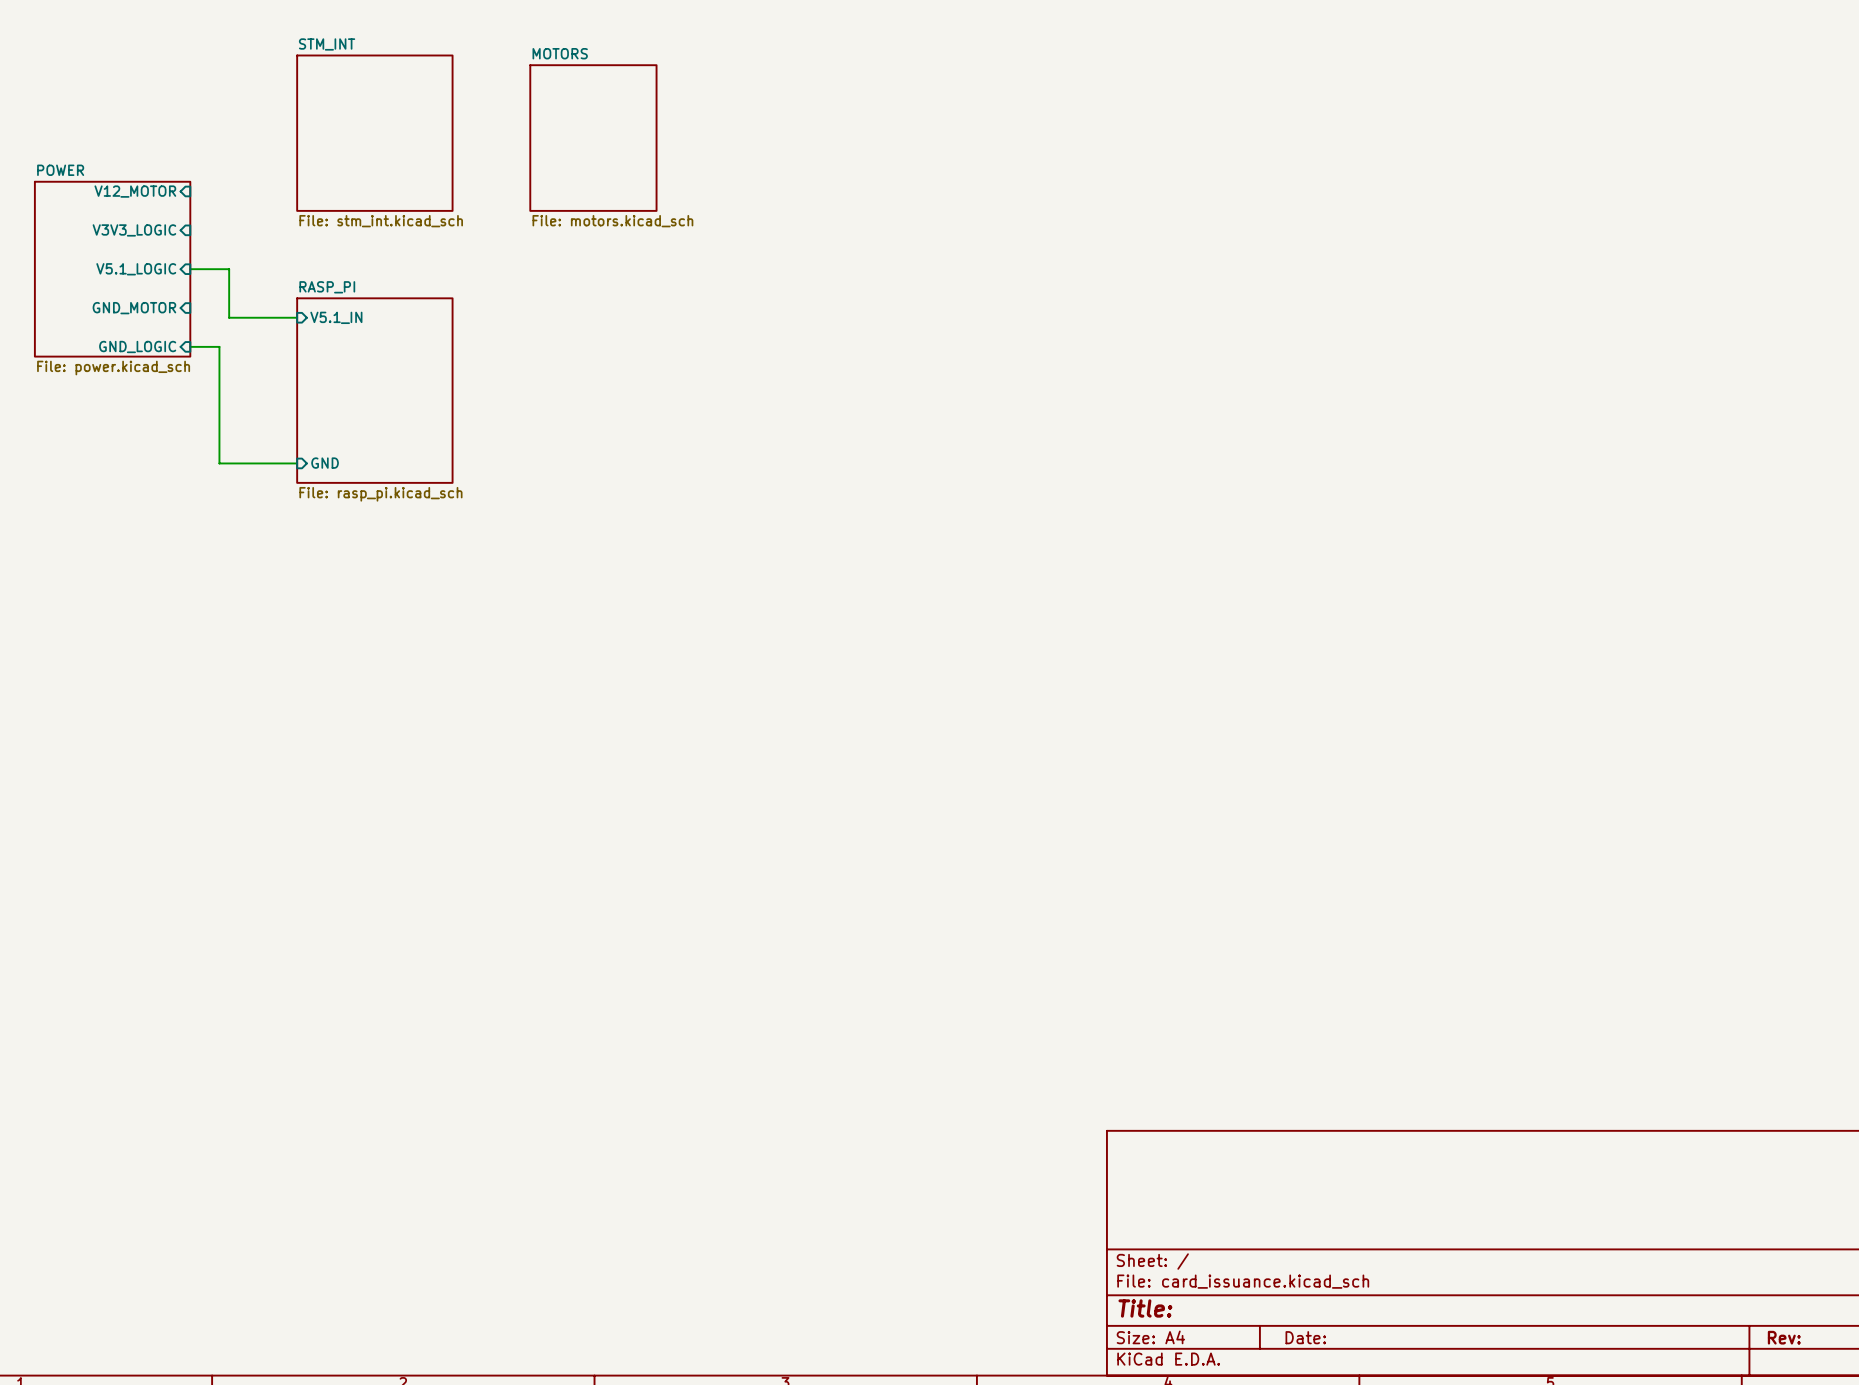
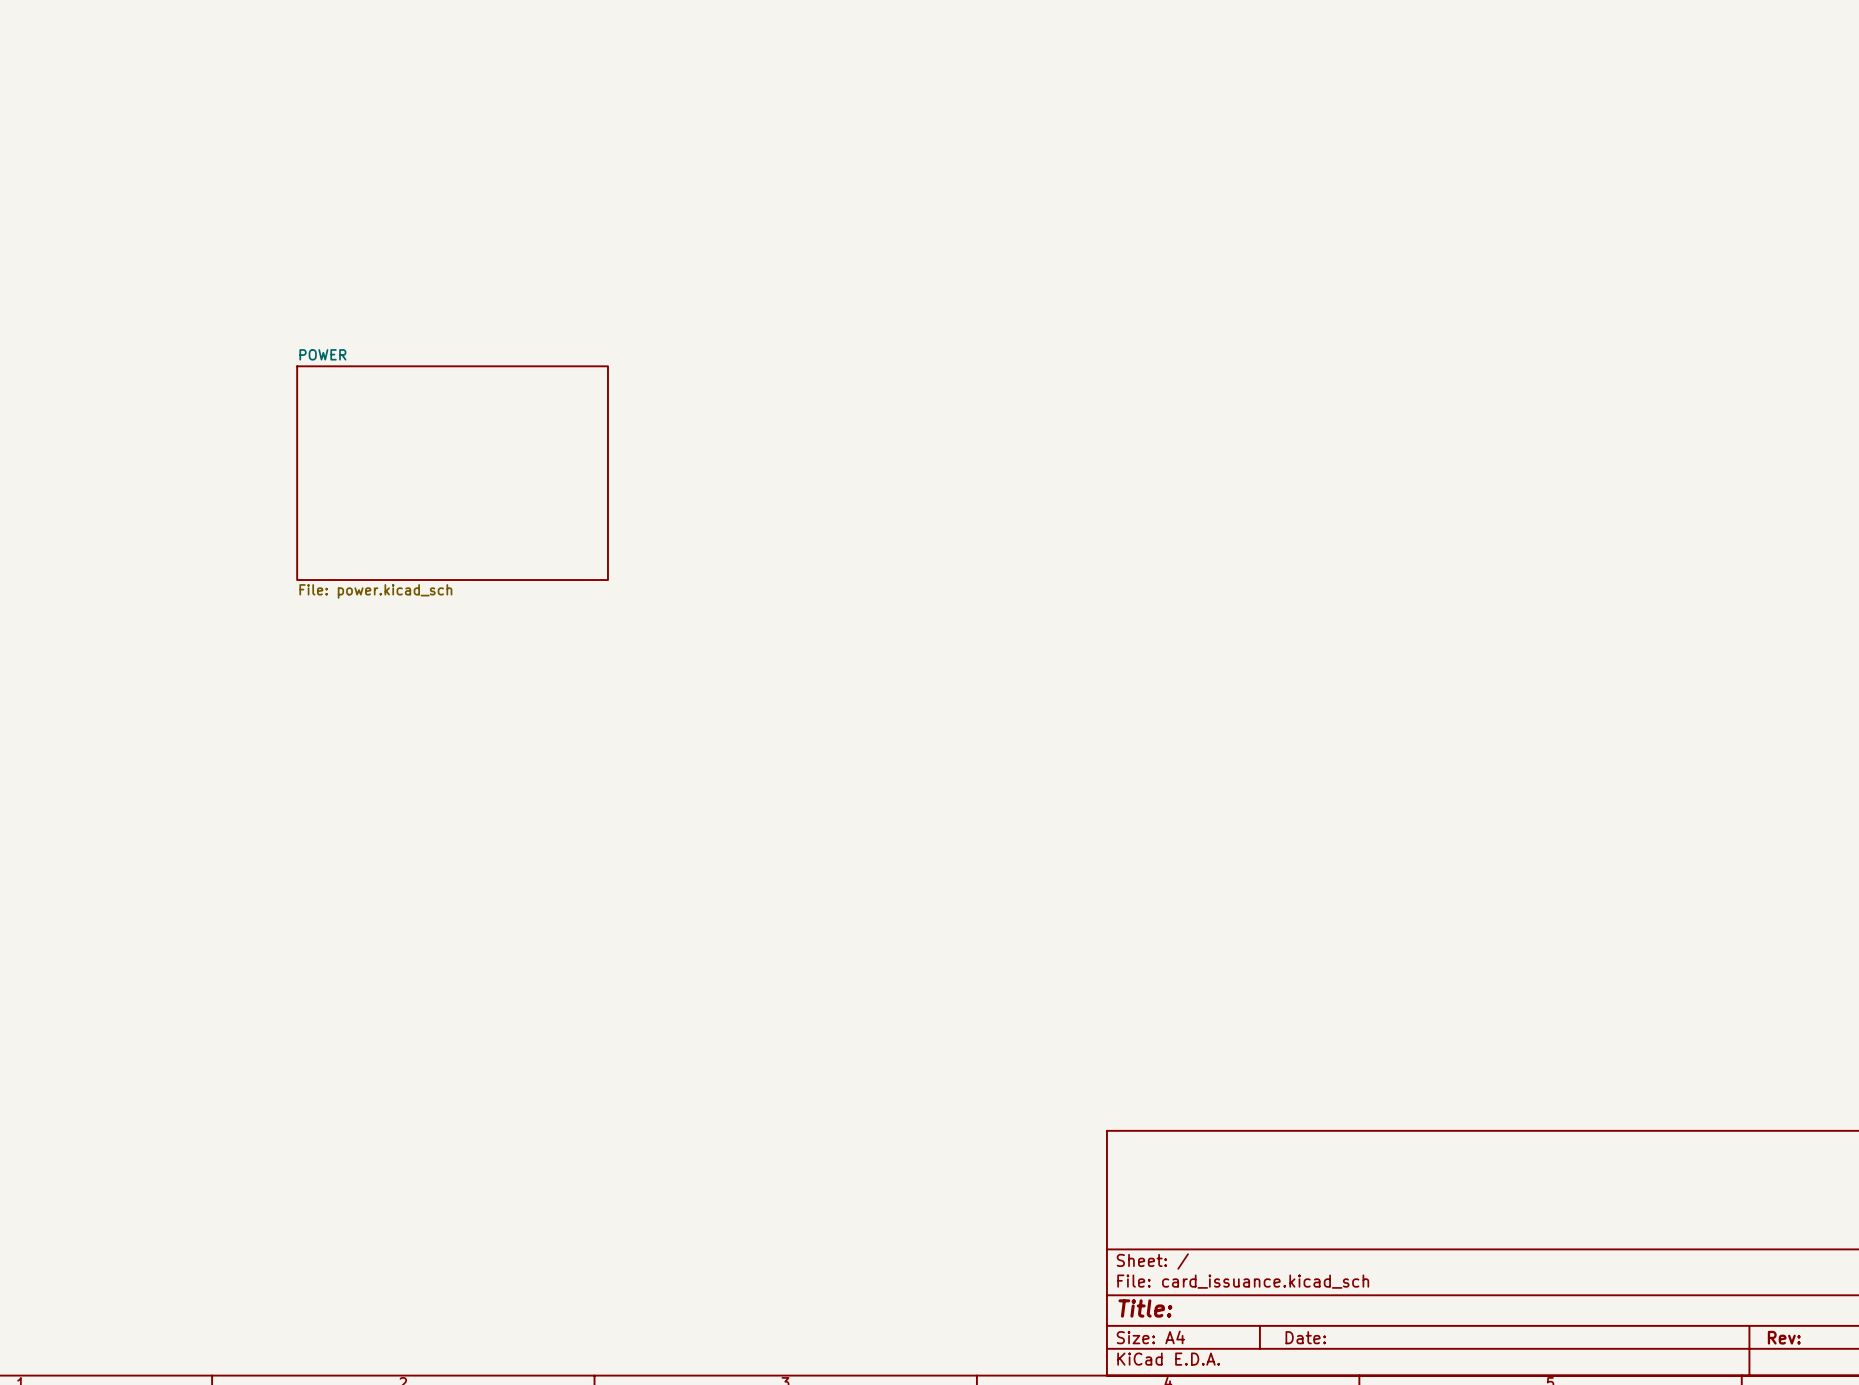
sheet STM_INT: File: stm_int.kicad_sch (374, 133) -> none
sheet MOTORS: File: motors.kicad_sch (593, 138) -> none
sheet pin: V12_MOTOR (135, 191) -> none
sheet pin: V3V3_LOGIC (134, 230) -> none
sheet POWER: File: power.kicad_sch (112, 269) -> none
sheet pin: V5.1_LOGIC (136, 269) -> none
wire: (190, 269) (229, 269) (229, 317) (297, 317) -> none
sheet pin: GND_MOTOR (134, 308) -> none
sheet pin: V5.1_IN (336, 317) -> none
sheet pin: GND_LOGIC (137, 346) -> none
wire: (190, 346) (219, 346) (219, 463) (297, 463) -> none
sheet RASP_PI: File: rasp_pi.kicad_sch (374, 390) -> none
sheet pin: GND (325, 463) -> none
sheet POWER: none -> File: power.kicad_sch (452, 473)

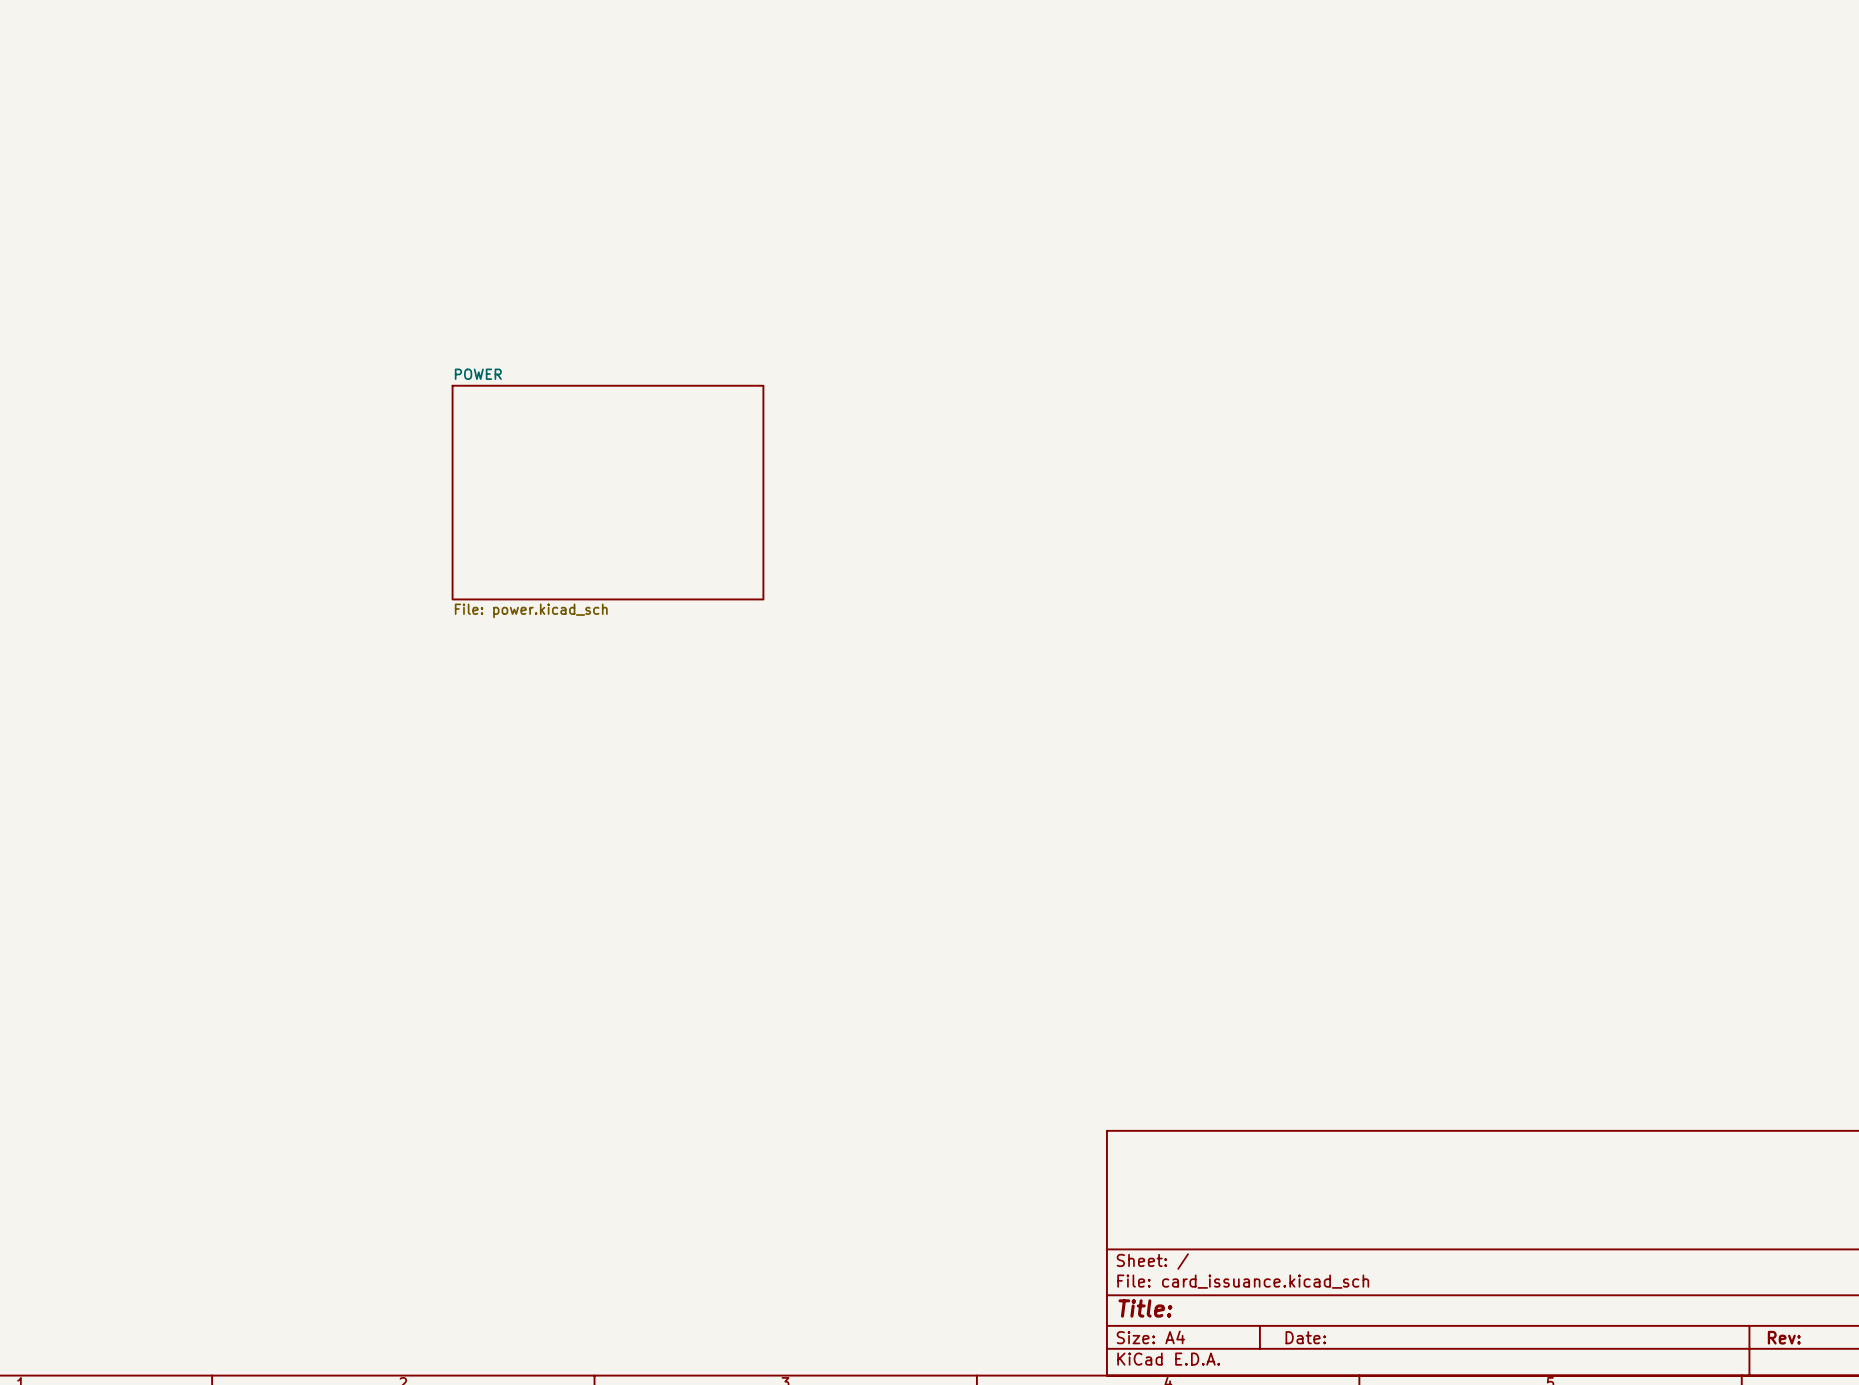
sheet POWER position: (452, 473) -> (607, 492)

